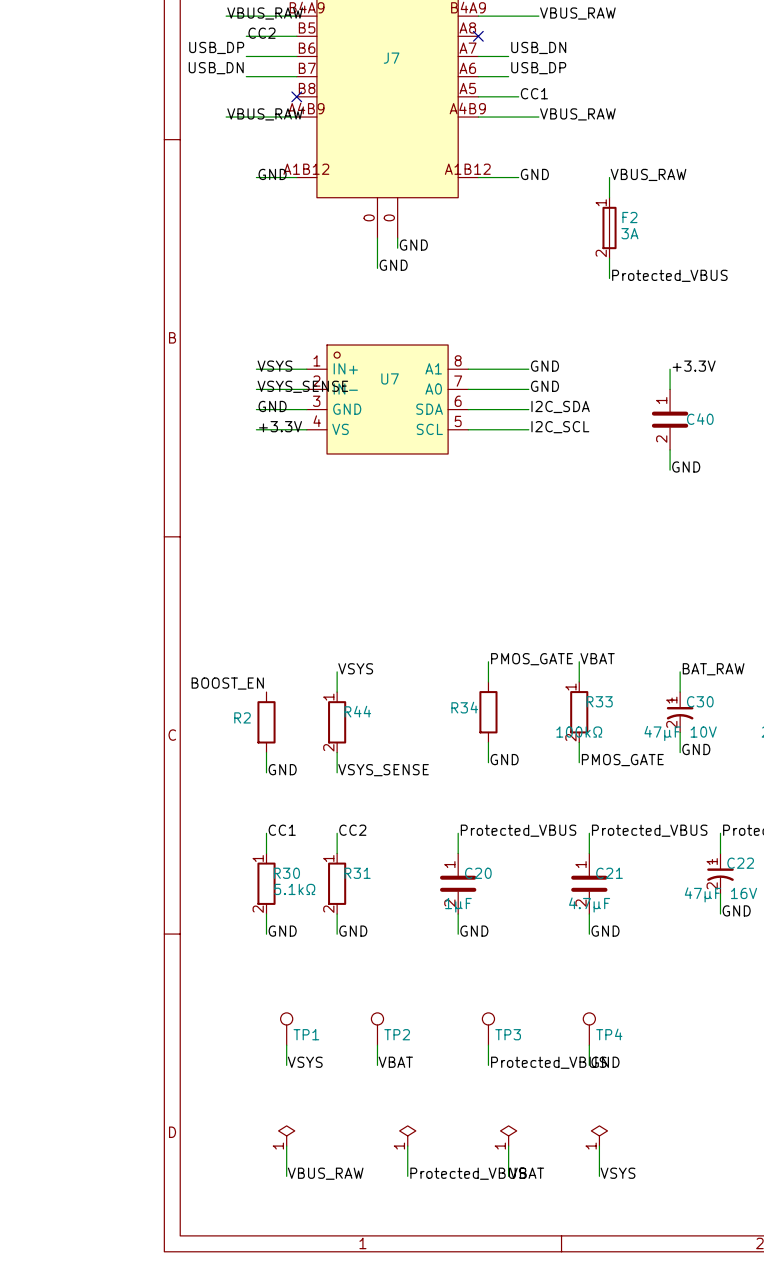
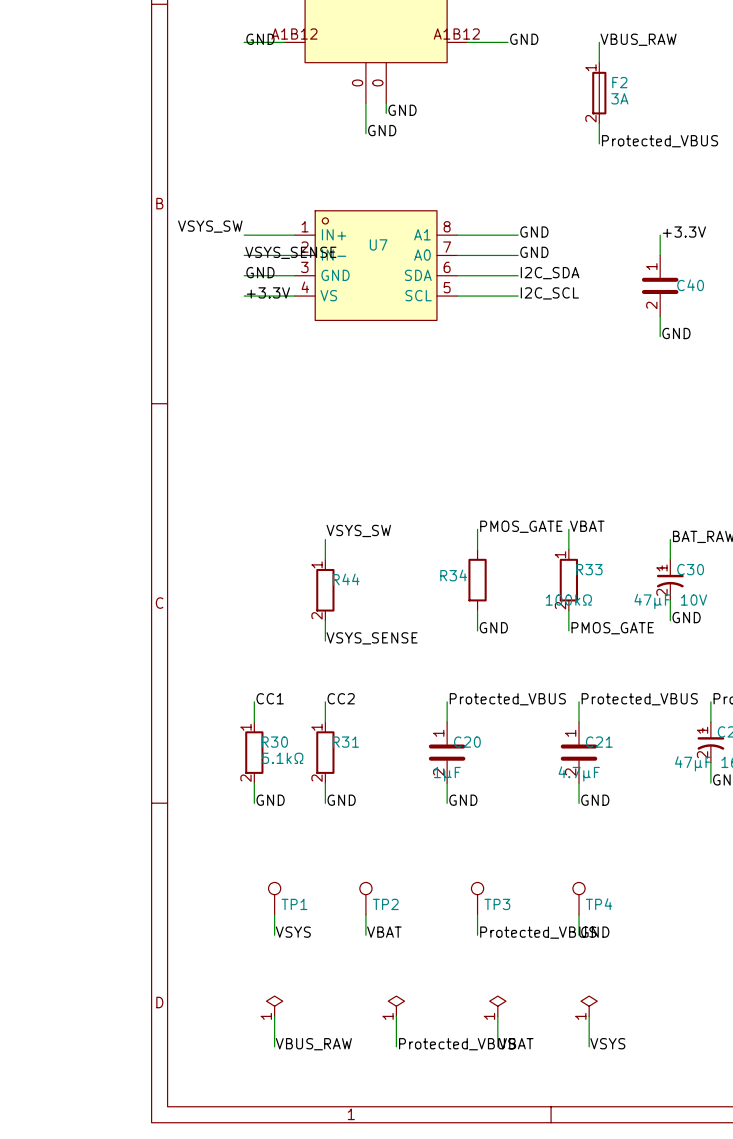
label: VSYS (274, 366) -> VSYS_SW (210, 226)
label: VSYS (355, 668) -> VSYS_SW (358, 530)
label: BOOST_EN (227, 683) -> none
R2: (266, 722) -> none
wire: (266, 752) (266, 772) -> none
label: GND (282, 769) -> none

